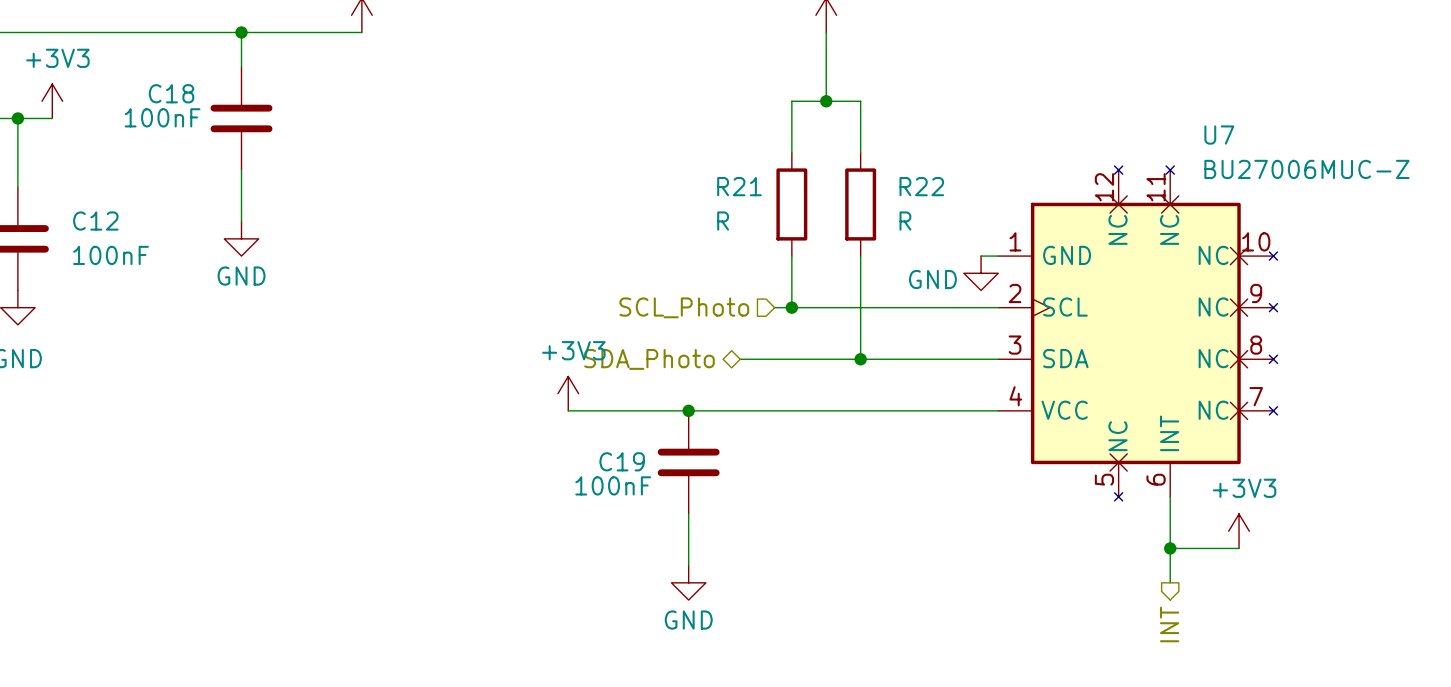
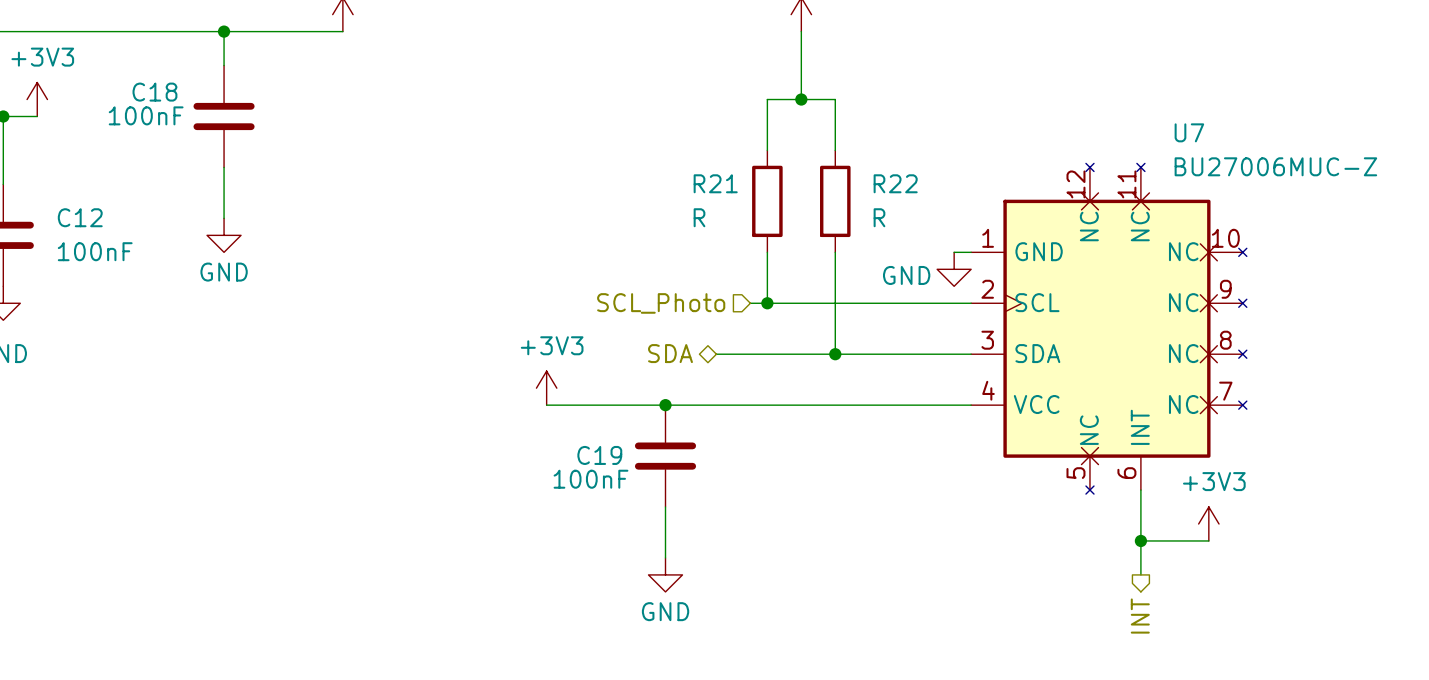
hierarchical label: SDA_Photo (649, 359) -> SDA (670, 353)

